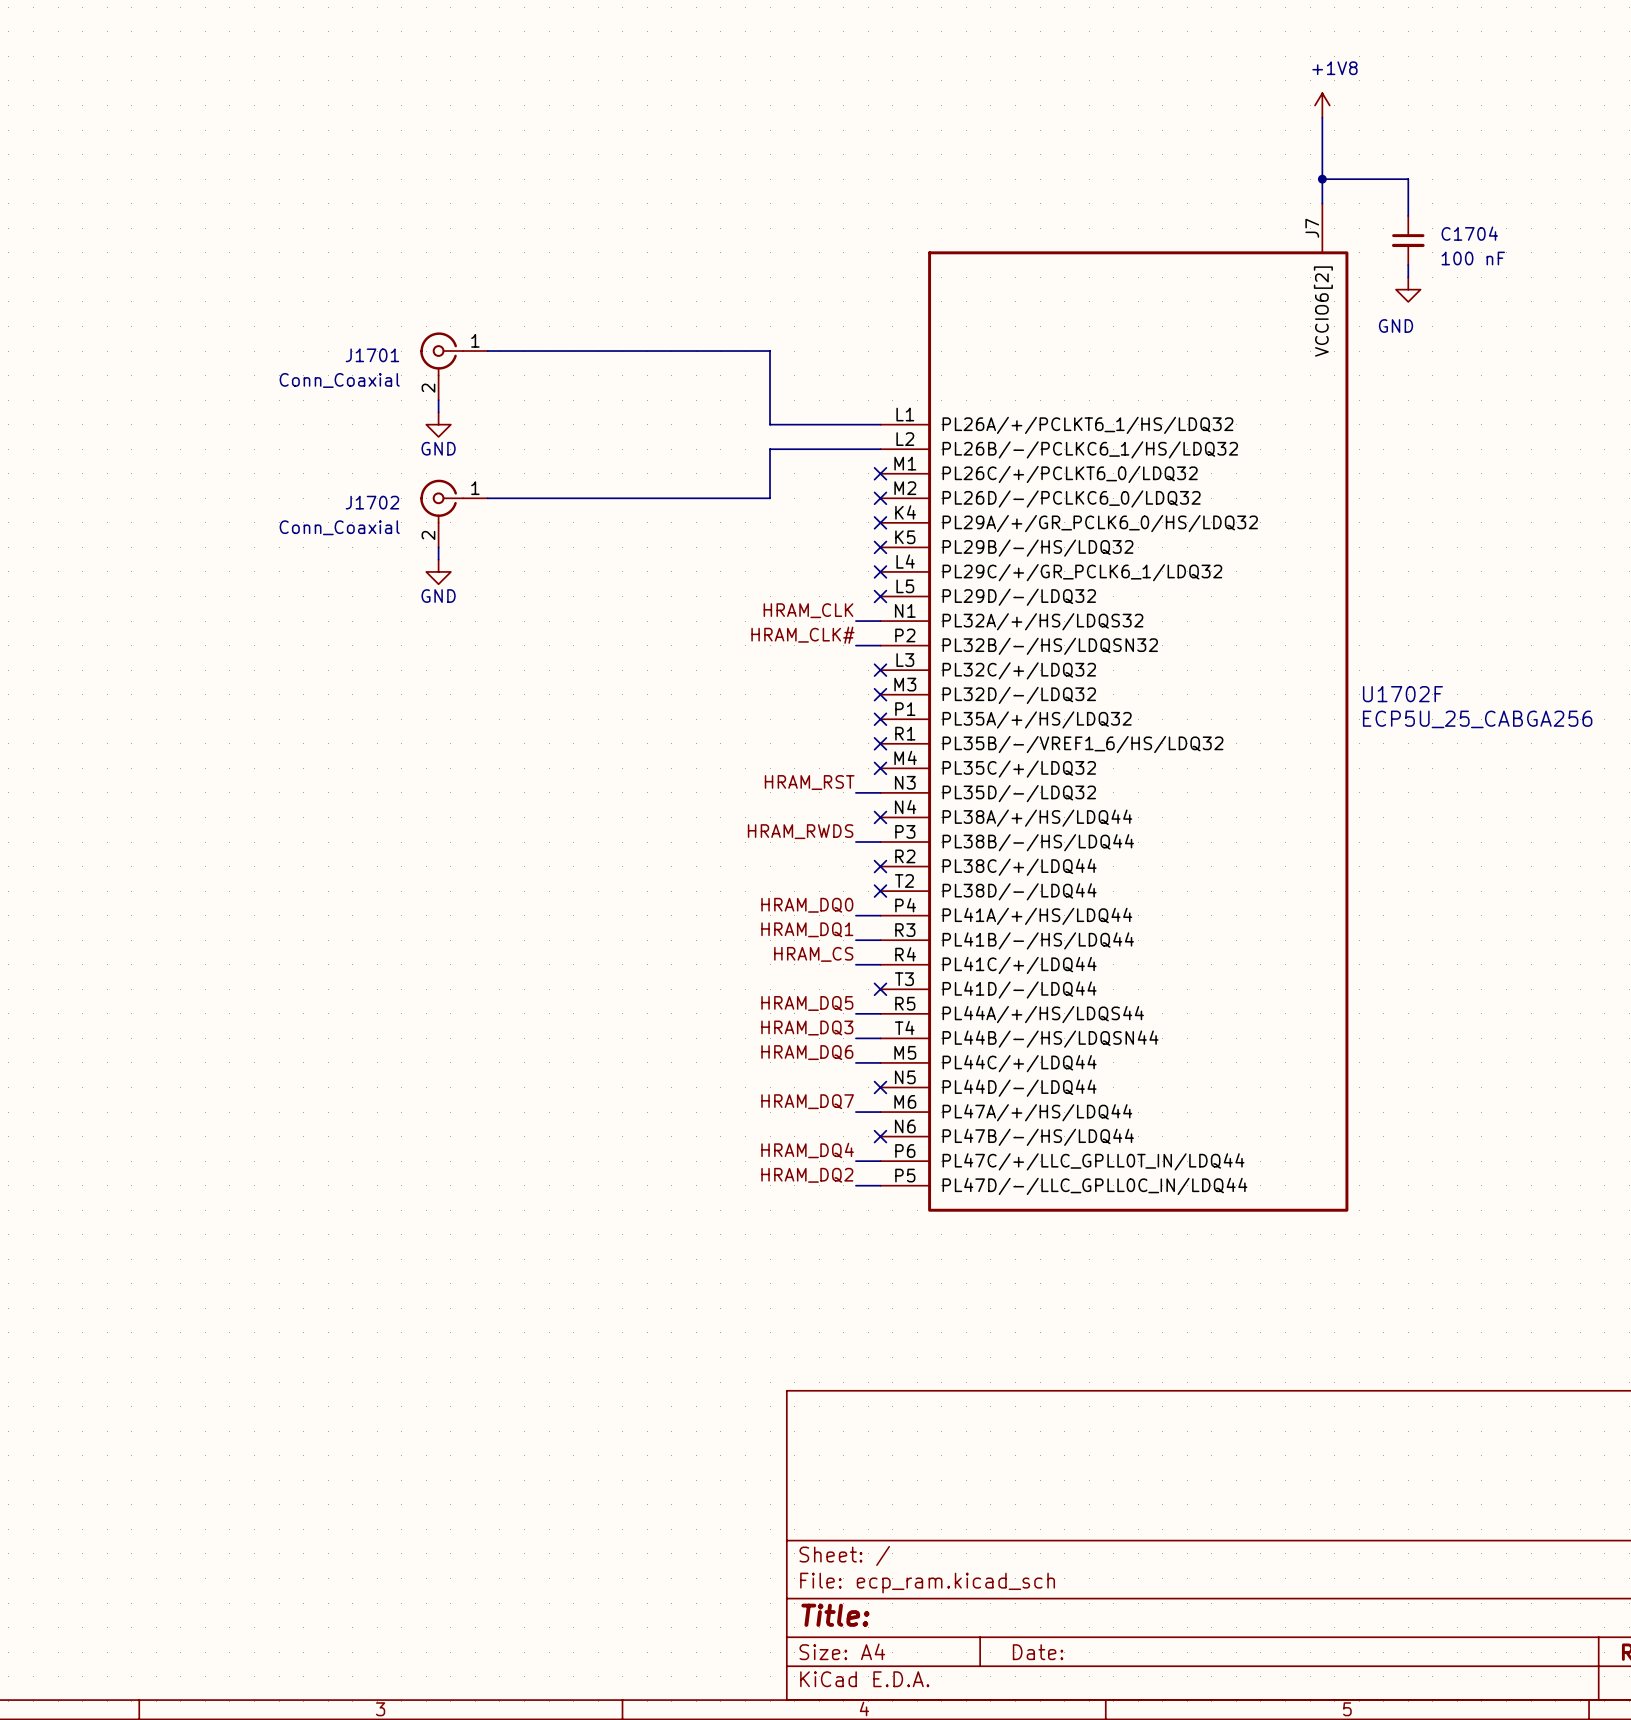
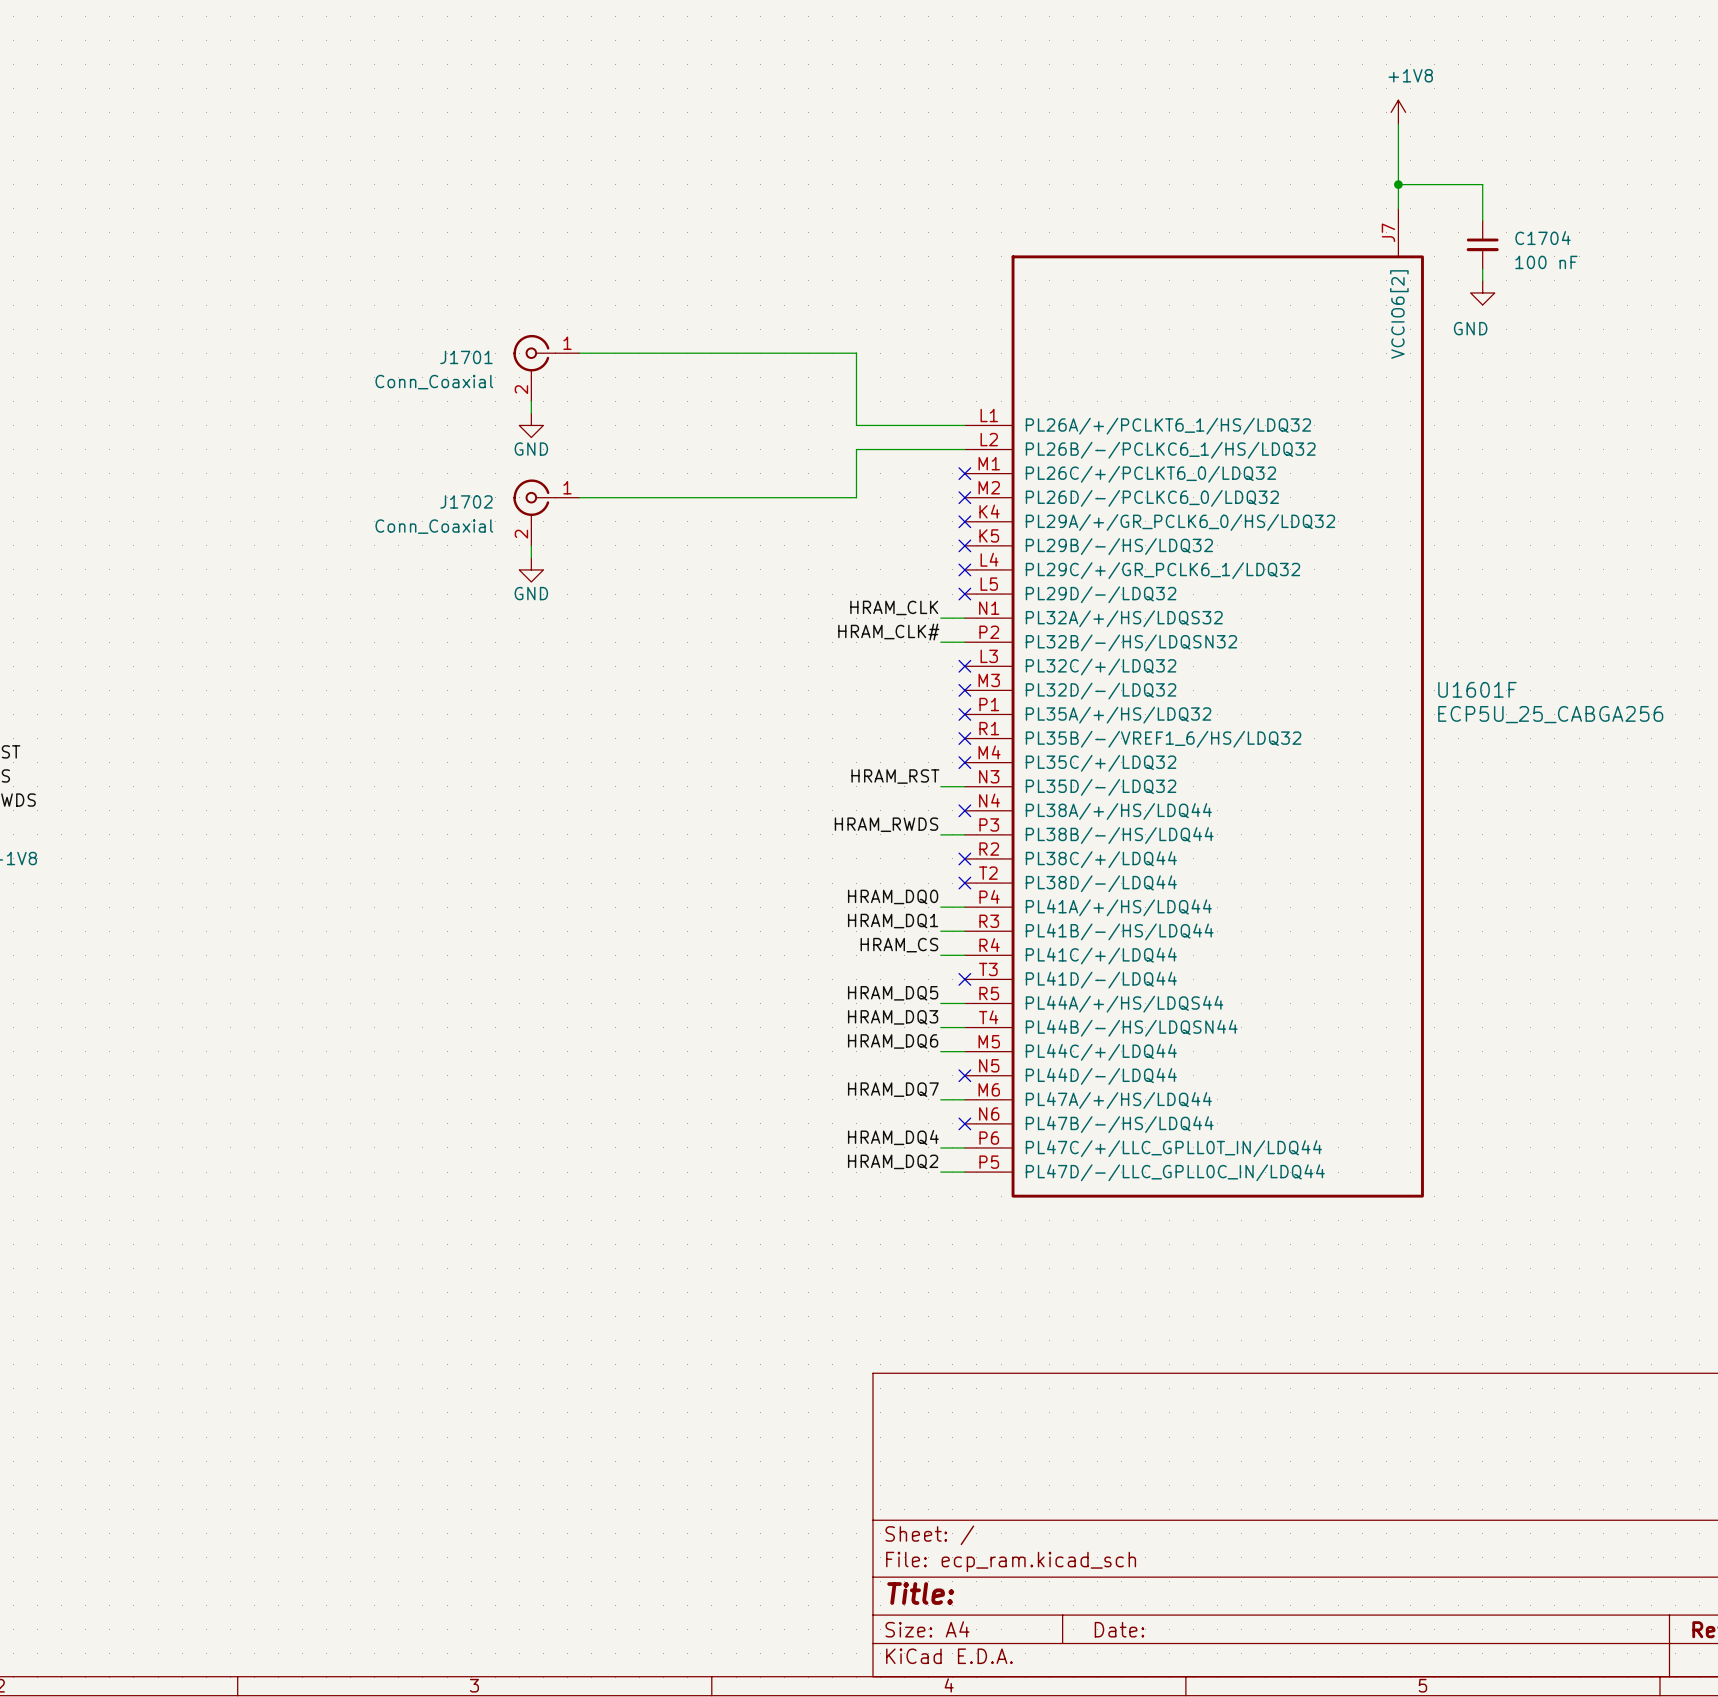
U1702F name: U1702F (1402, 694) -> U1601F (1477, 689)

